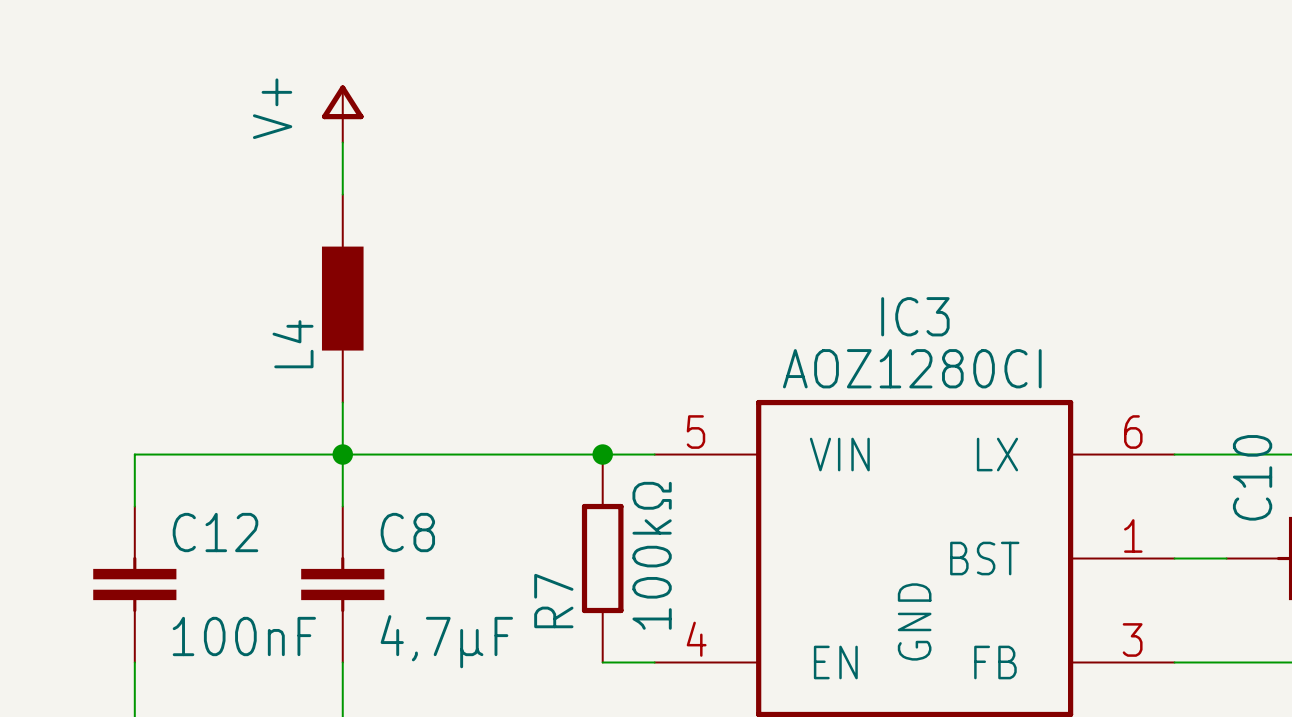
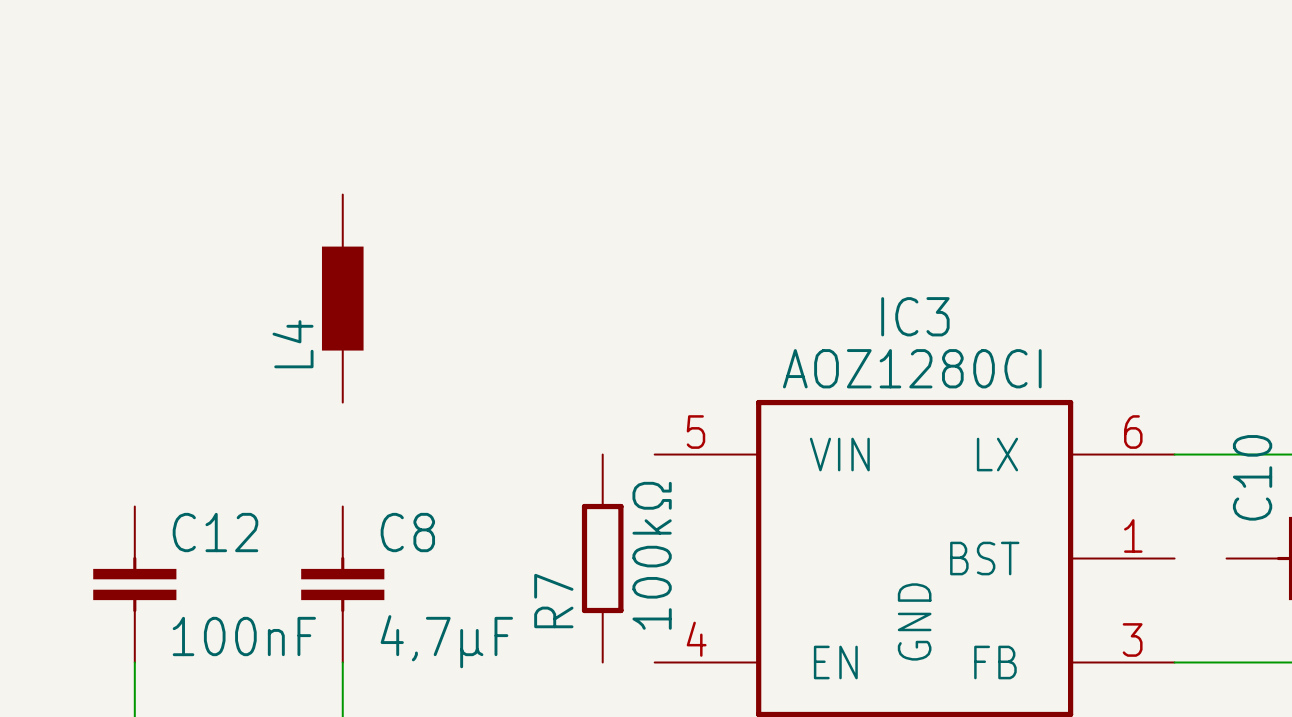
power symbol: V+ (342, 114) -> none
wire: (342, 142) (342, 194) -> none
wire: (342, 402) (342, 506) -> none
junction: (342, 454) -> none
junction: (602, 454) -> none
wire: (654, 454) (134, 454) (134, 506) -> none
wire: (1174, 558) (1226, 558) -> none
wire: (602, 662) (654, 662) -> none

